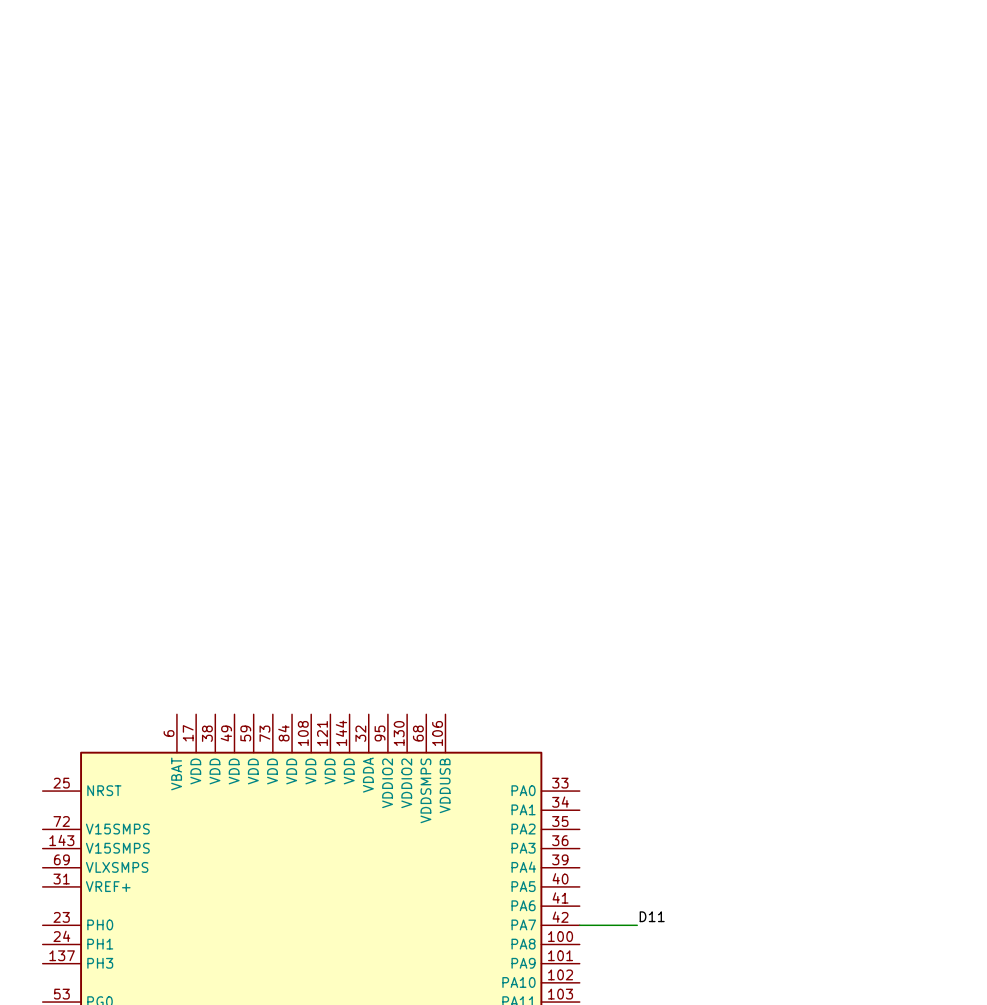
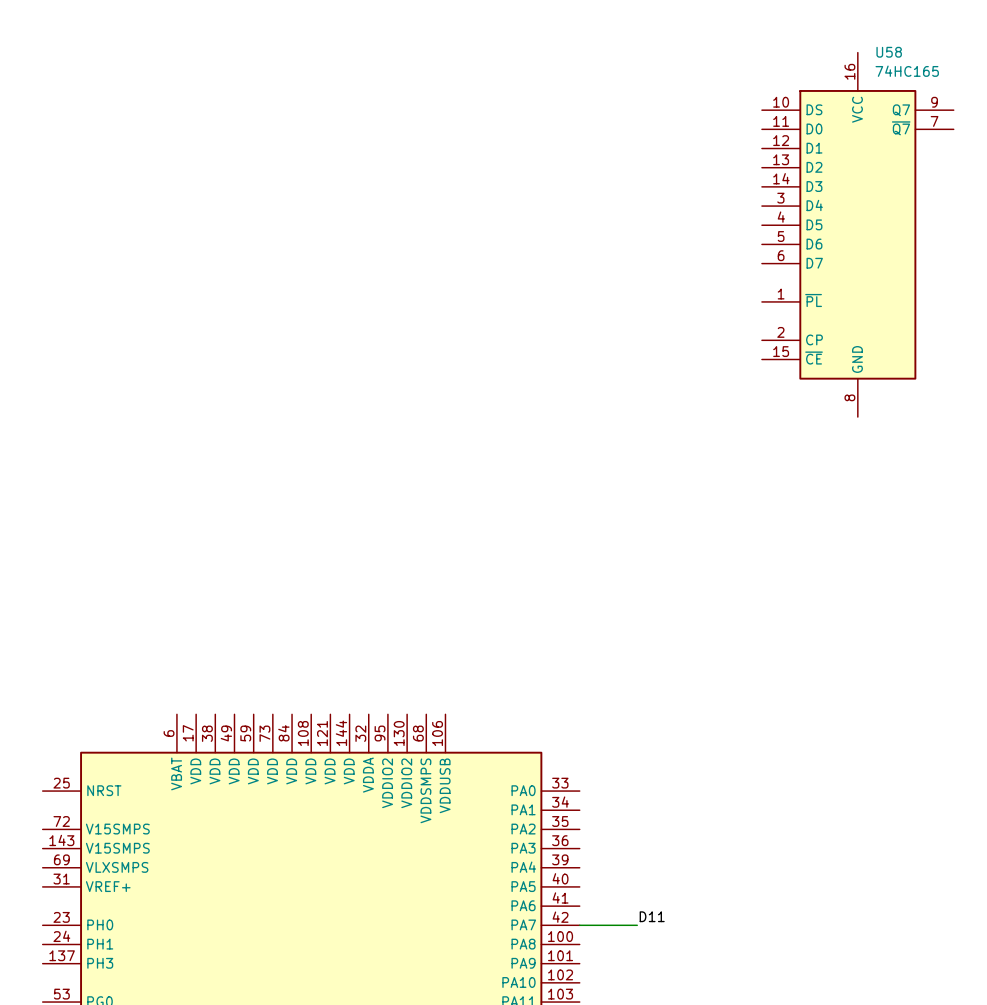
U58: none -> 74HC165 (857, 234)

